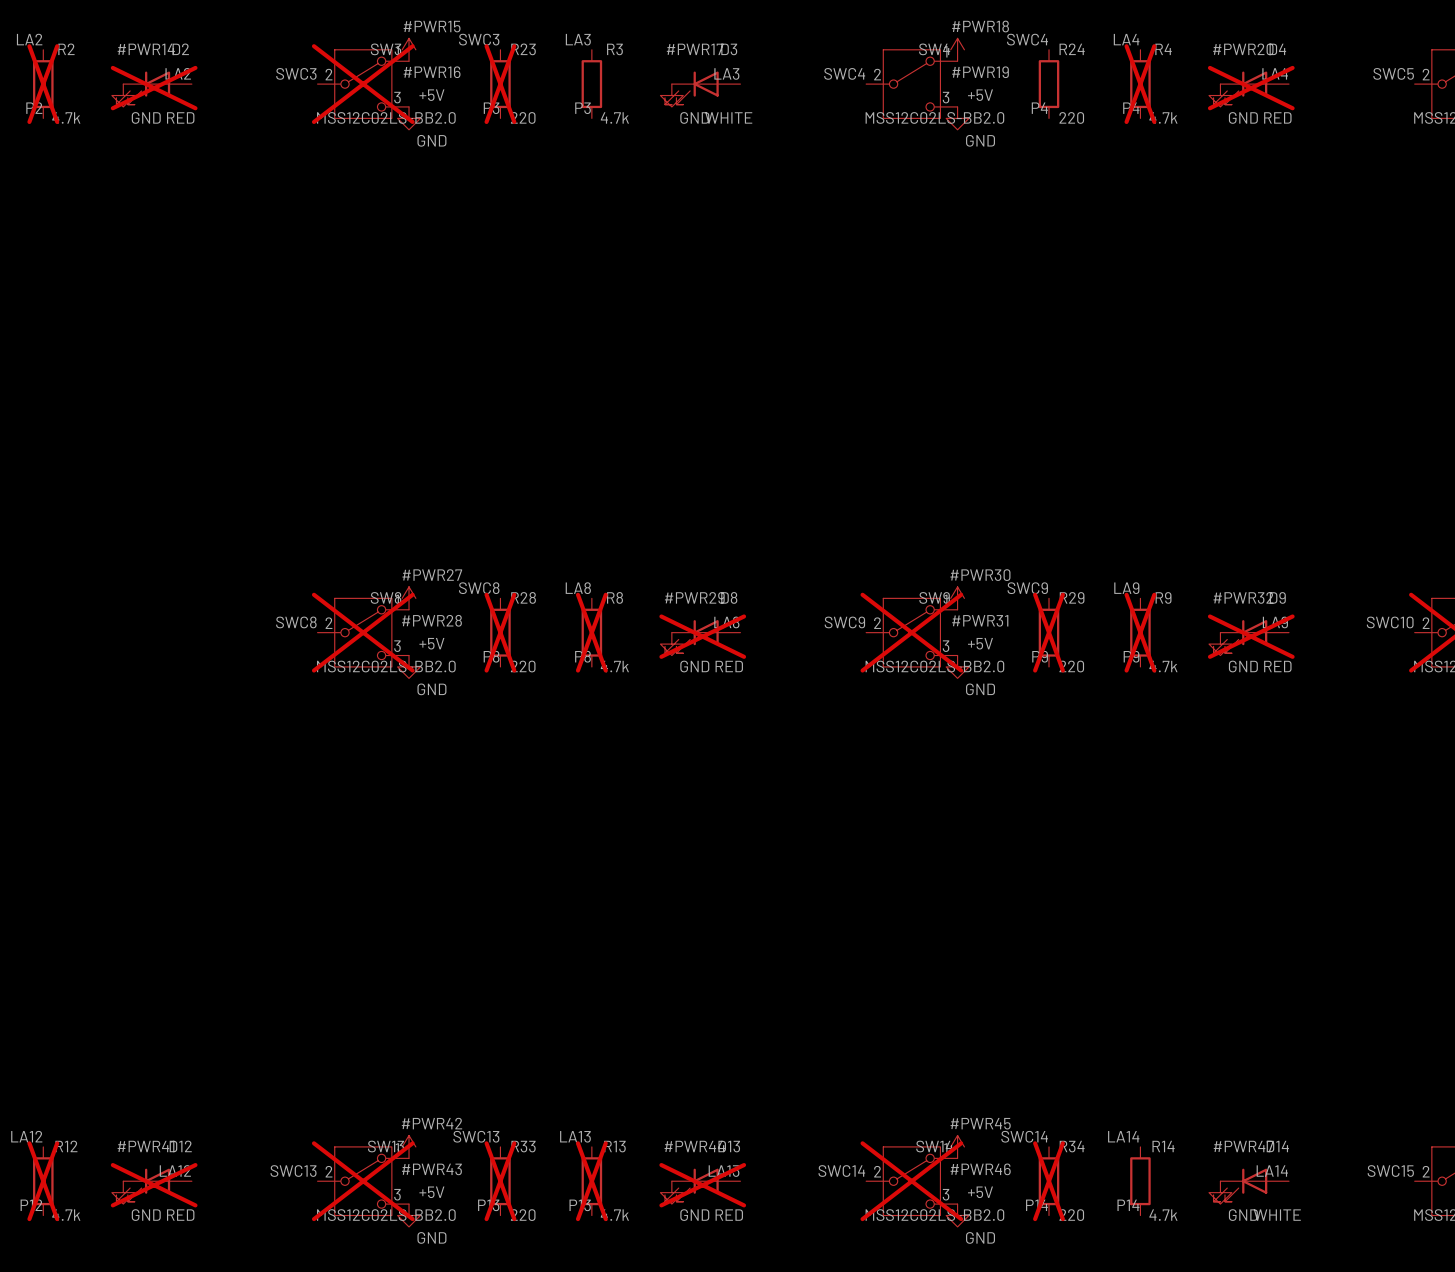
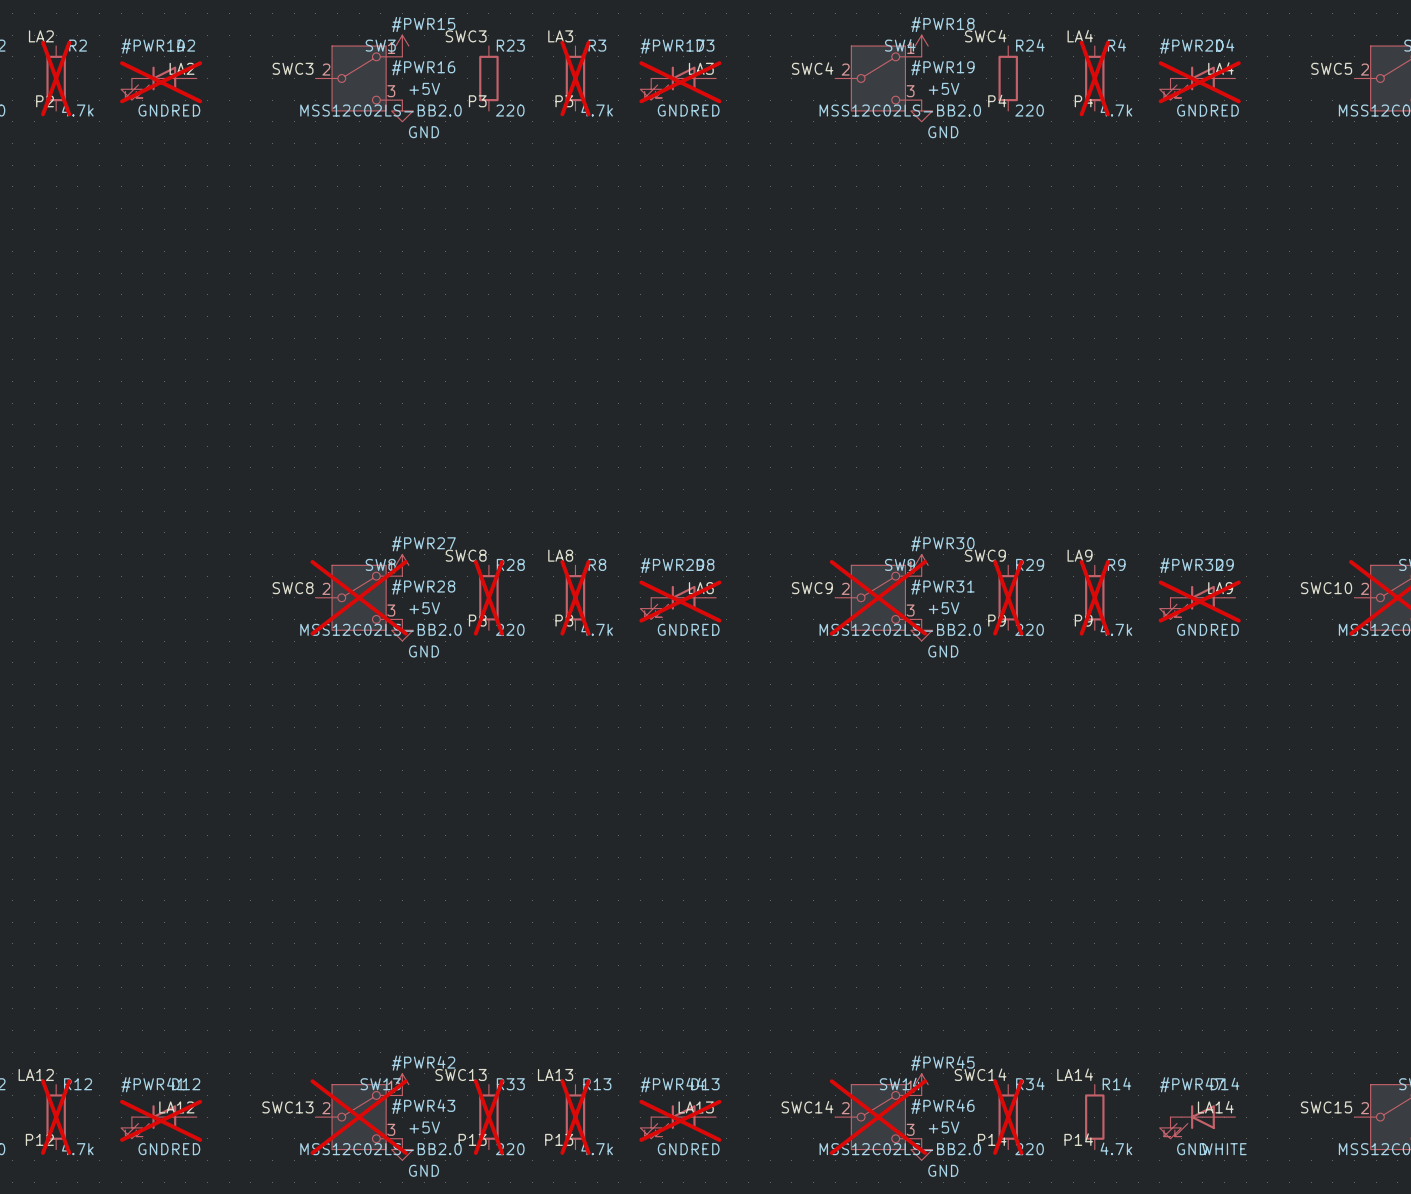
SW3 do-not-place cross: (363, 84) -> none
R23 do-not-place cross: (500, 84) -> none
R3 do-not-place cross: none -> (575, 78)
D3 do-not-place cross: none -> (680, 82)
D3 value: WHITE (728, 117) -> RED (705, 110)

